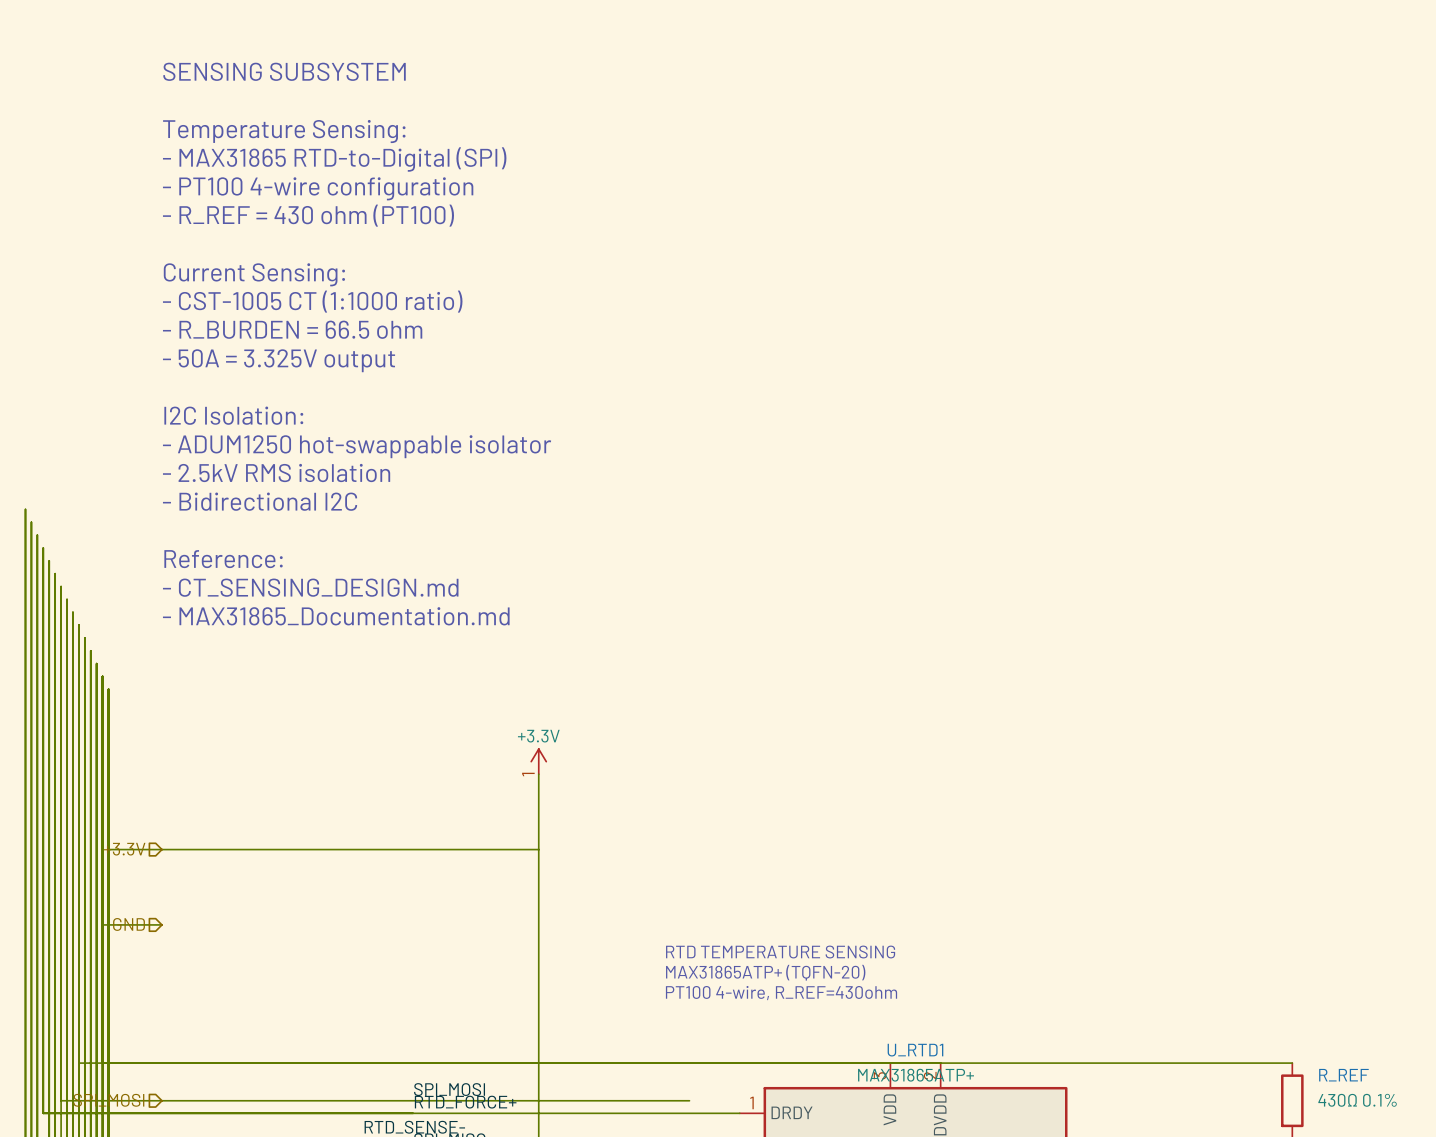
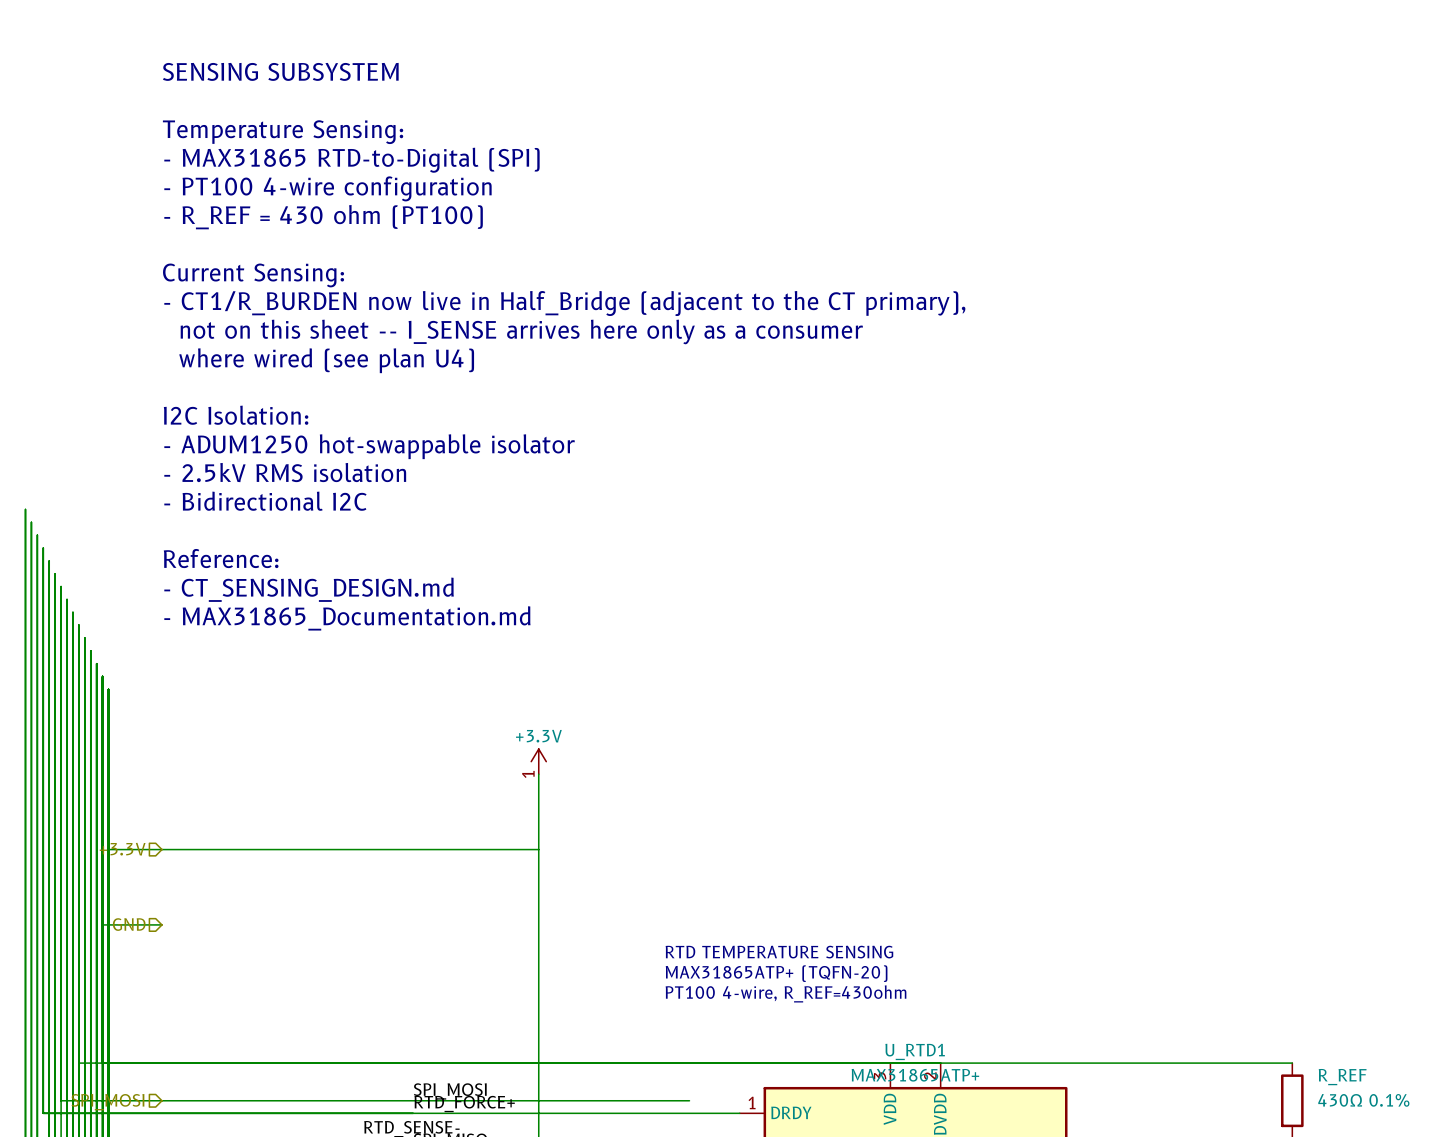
text: - CST-1005 CT (1:1000 ratio) (312, 301) -> - CT1/R_BURDEN now live in Half_Bridge (adjacent to the CT primary), (564, 303)
text: - R_BURDEN = 66.5 ohm (292, 329) -> not on this sheet -- I_SENSE arrives here only as a consumer (521, 331)
text: - 50A = 3.325V output (279, 360) -> where wired (see plan U4) (326, 360)

